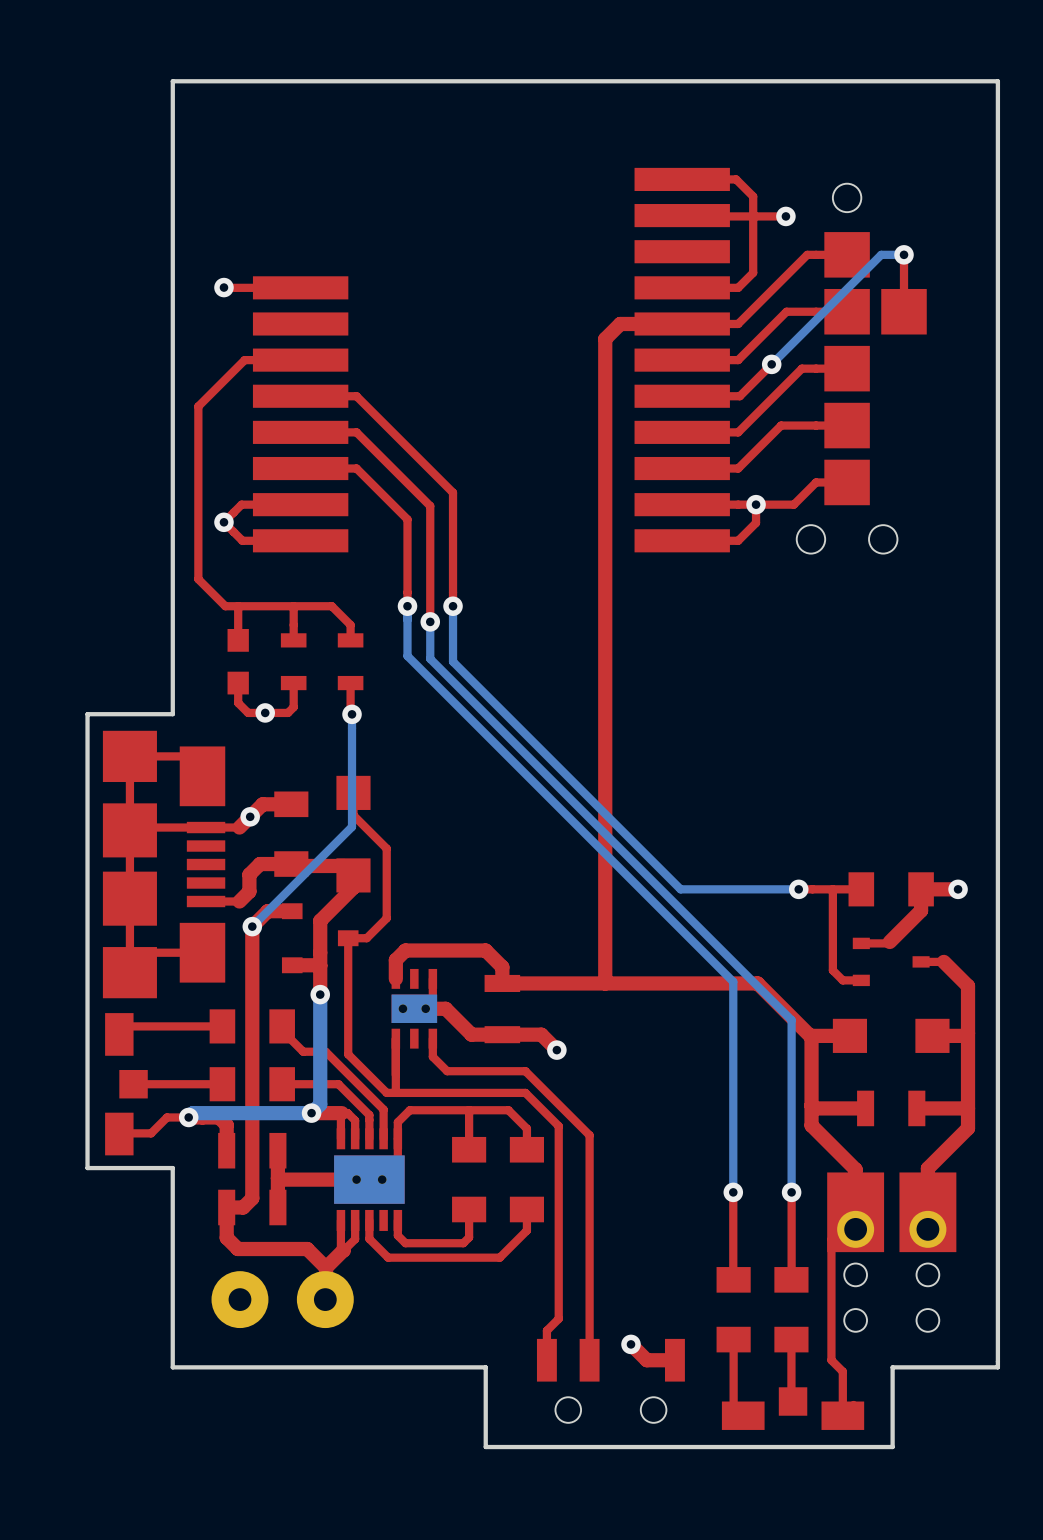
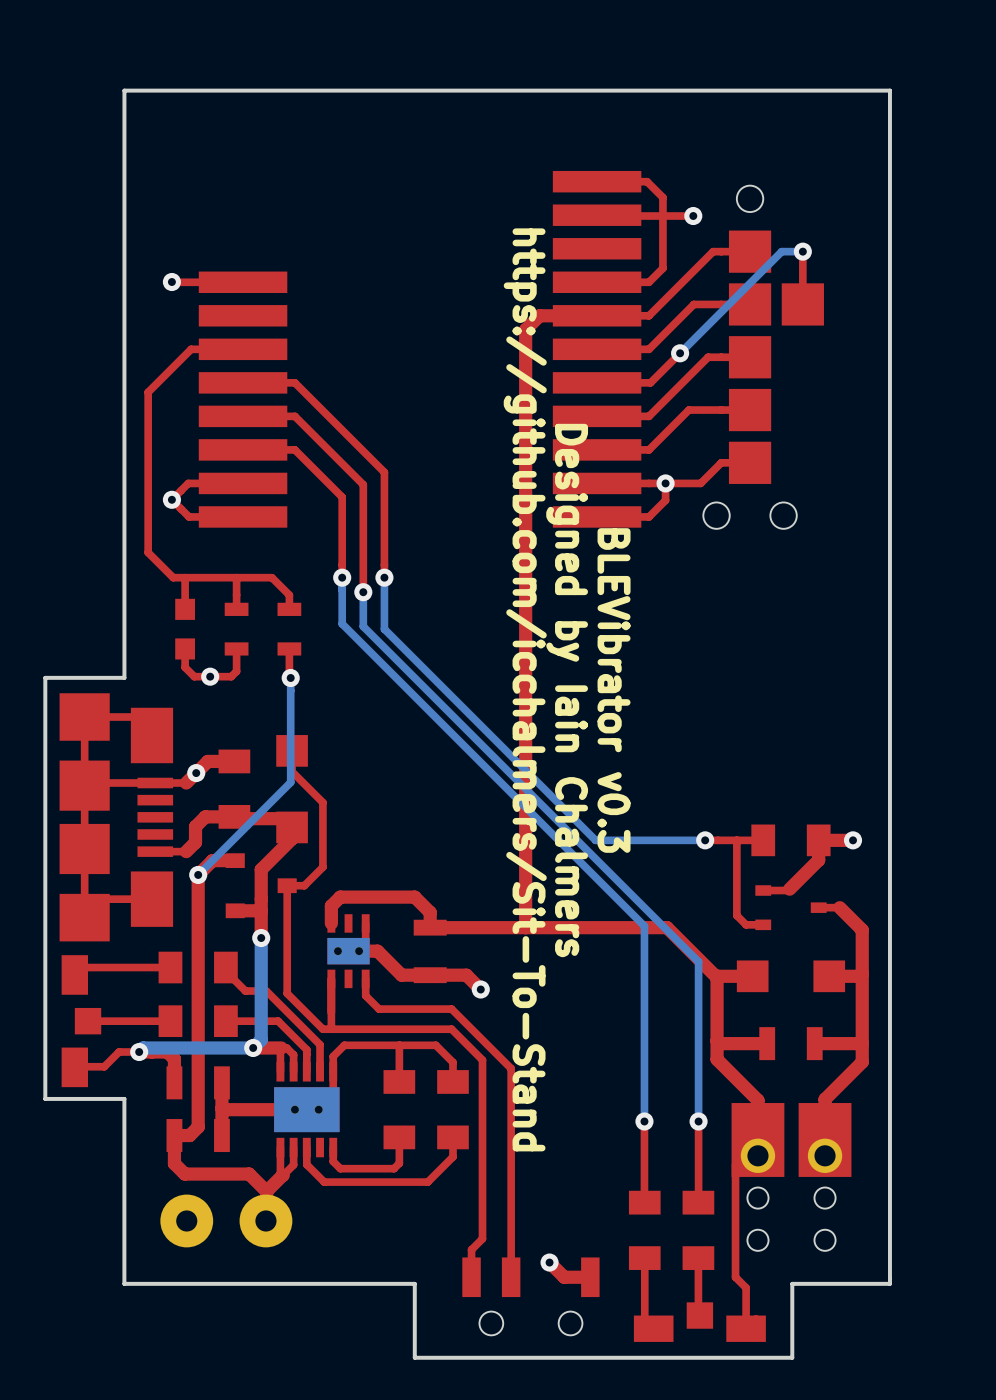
text: none -> https://github.com/icchalmers/Sit-To-Stand (525, 689)
text: none -> Designed by Iain Chalmers (567, 690)
text: none -> BLEVibrator v0.3 (614, 690)

